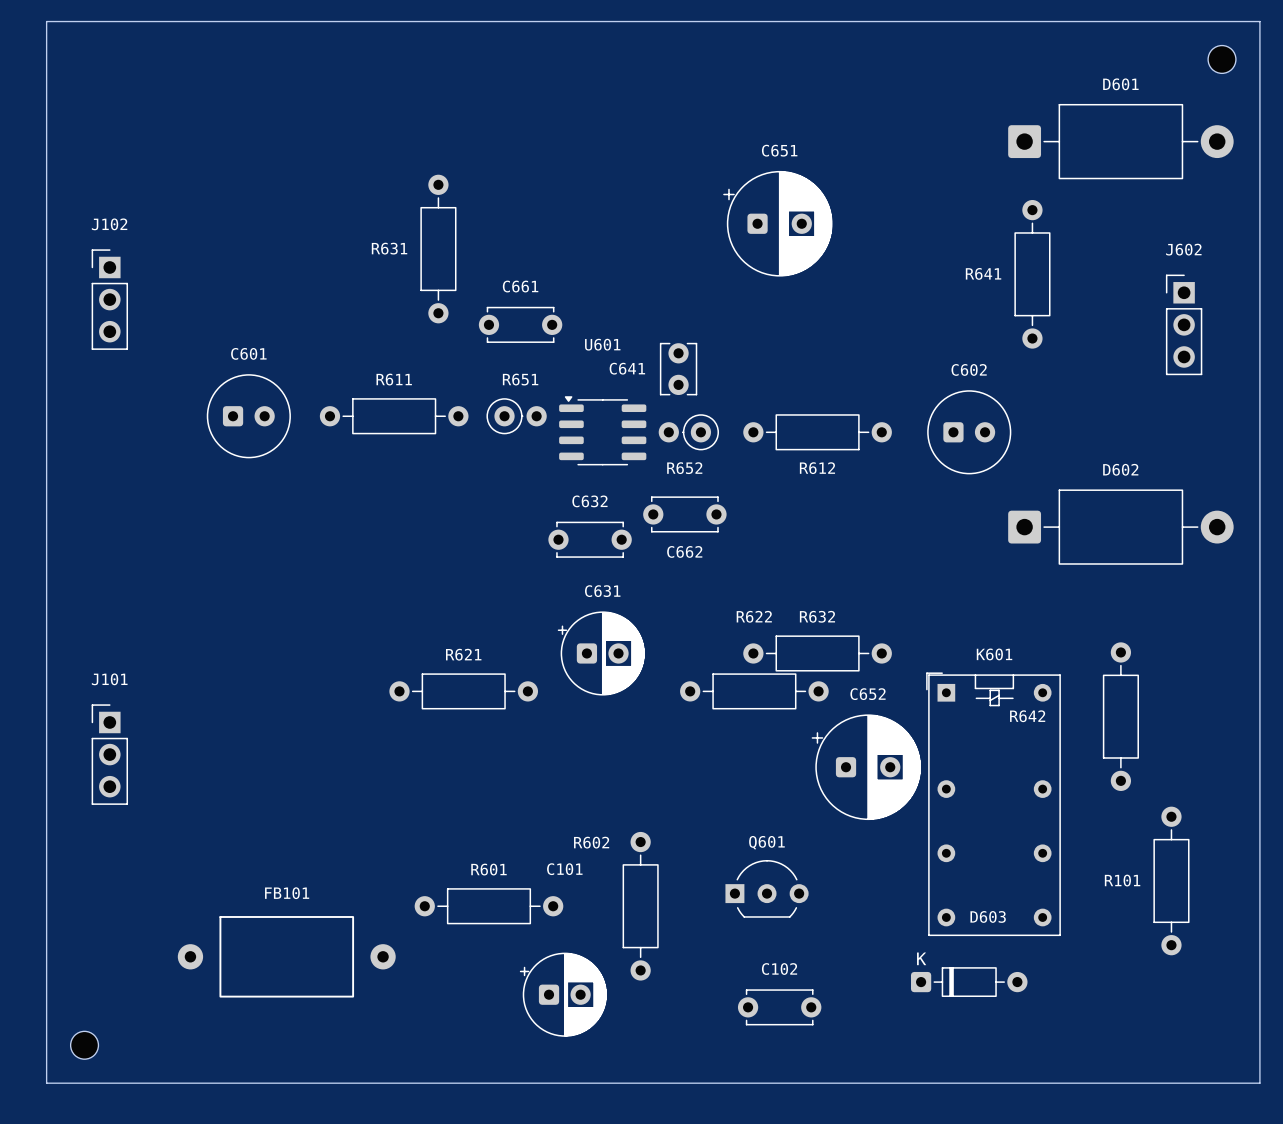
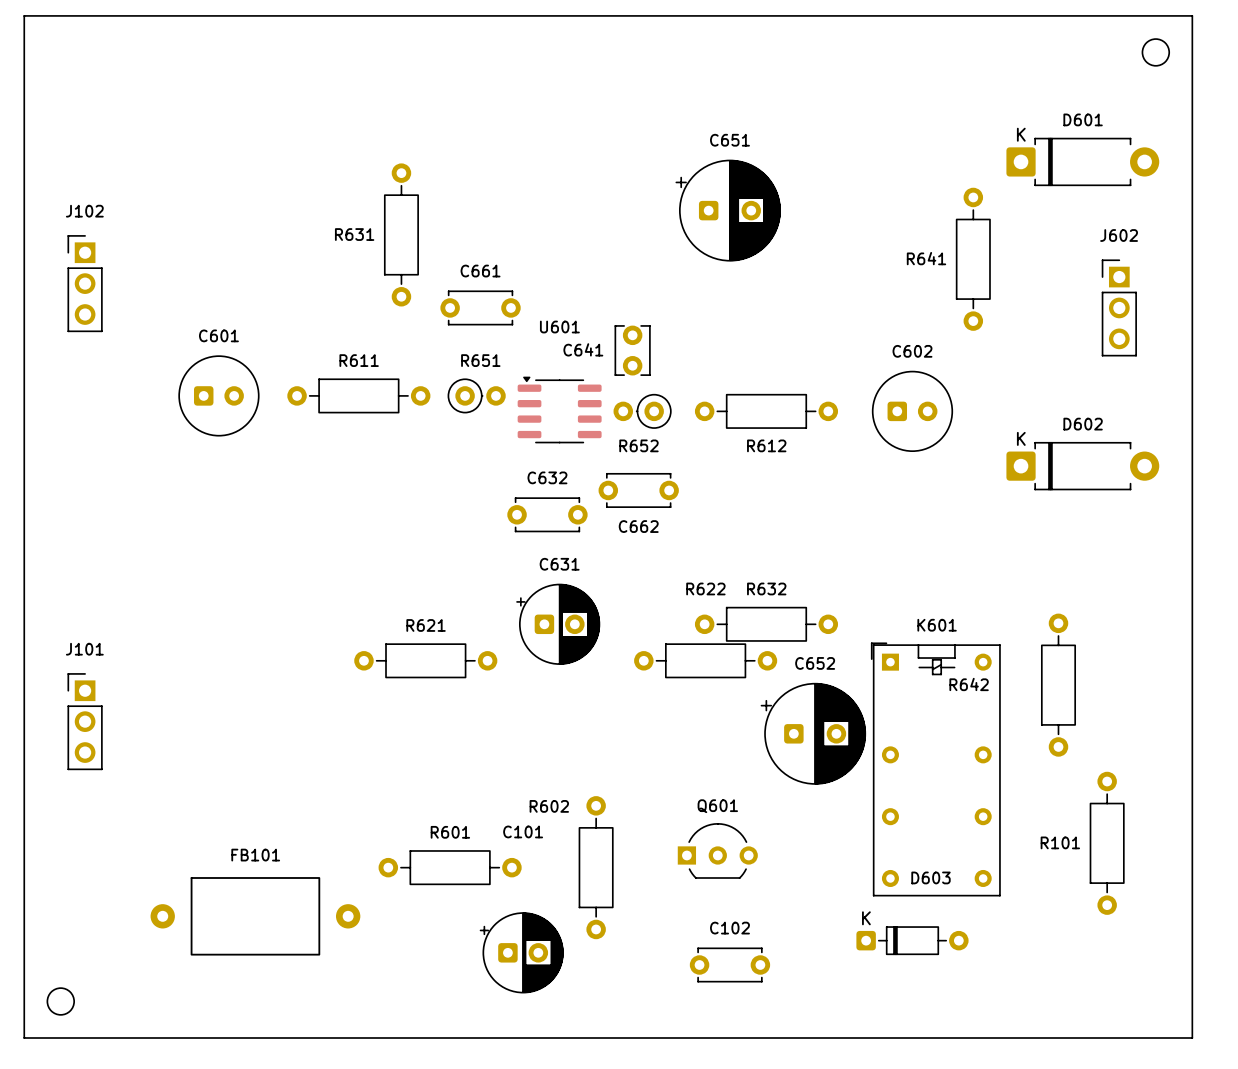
text position: D601 (1120, 84) -> D601 (1083, 119)
part: (1120, 141) -> none
part: none -> (1082, 161)
text position: D602 (1120, 469) -> D602 (1083, 424)
part: none -> (1082, 466)
part: (1120, 527) -> none

